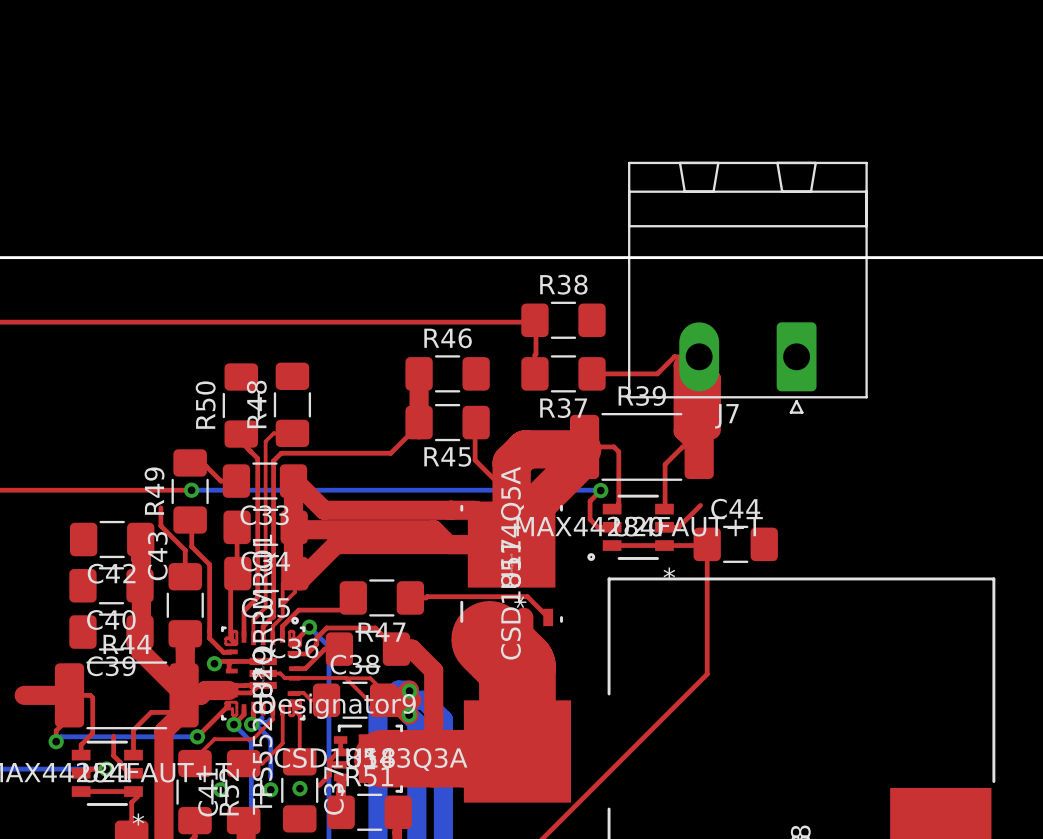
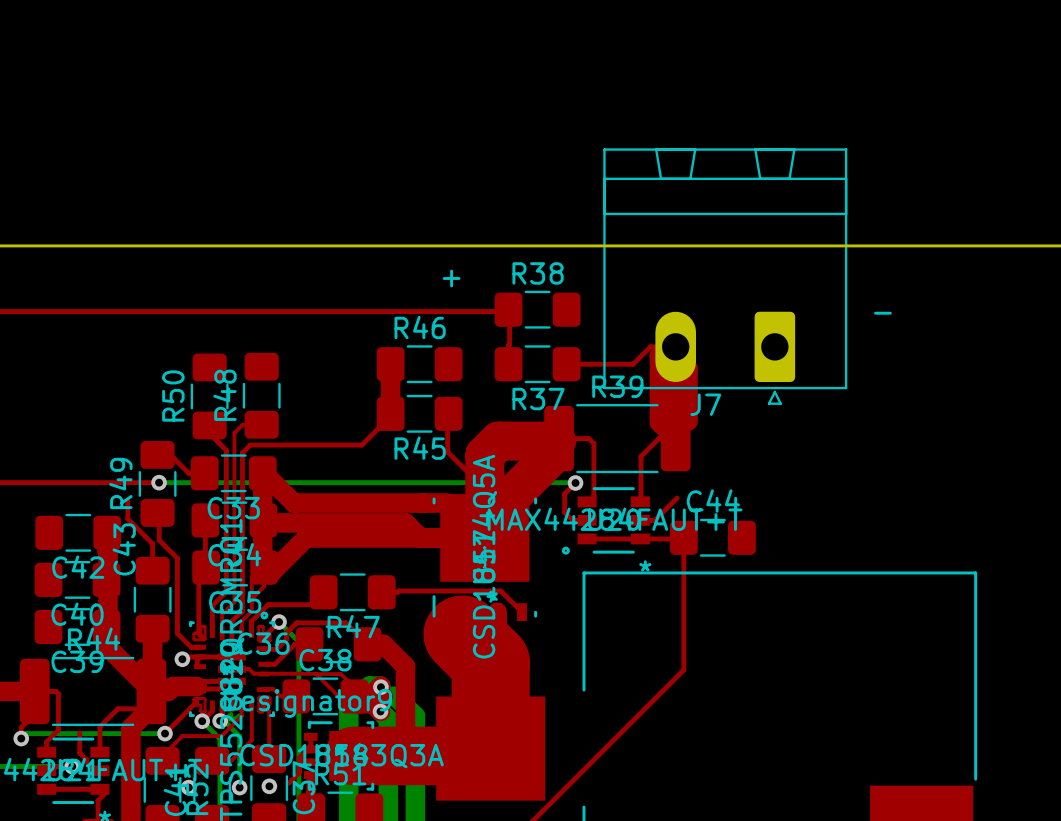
text: none -> + (451, 278)
text: none -> - (882, 313)

